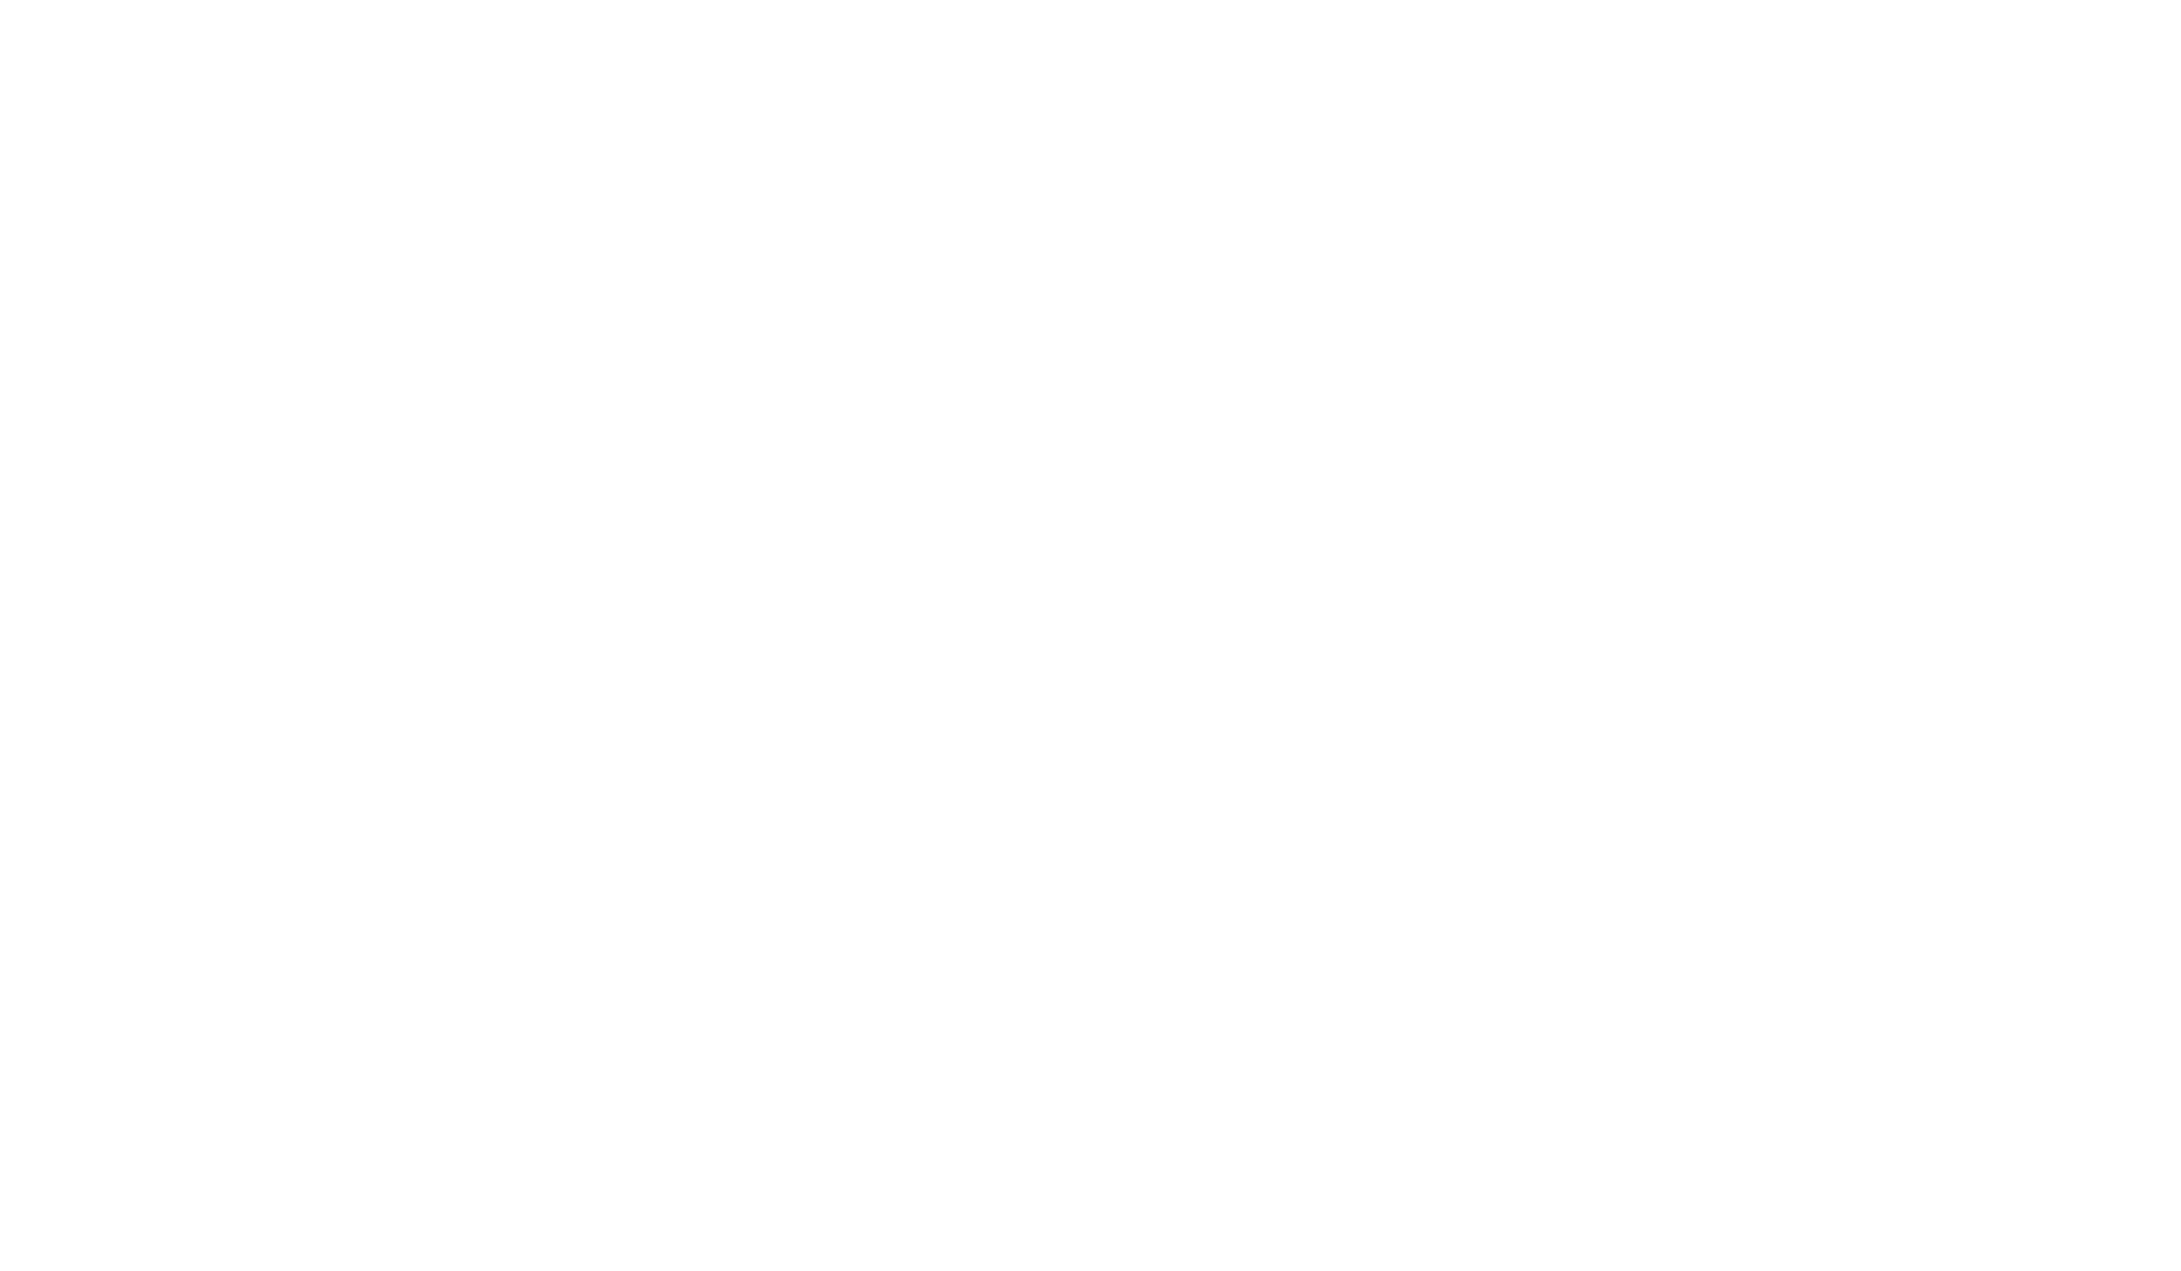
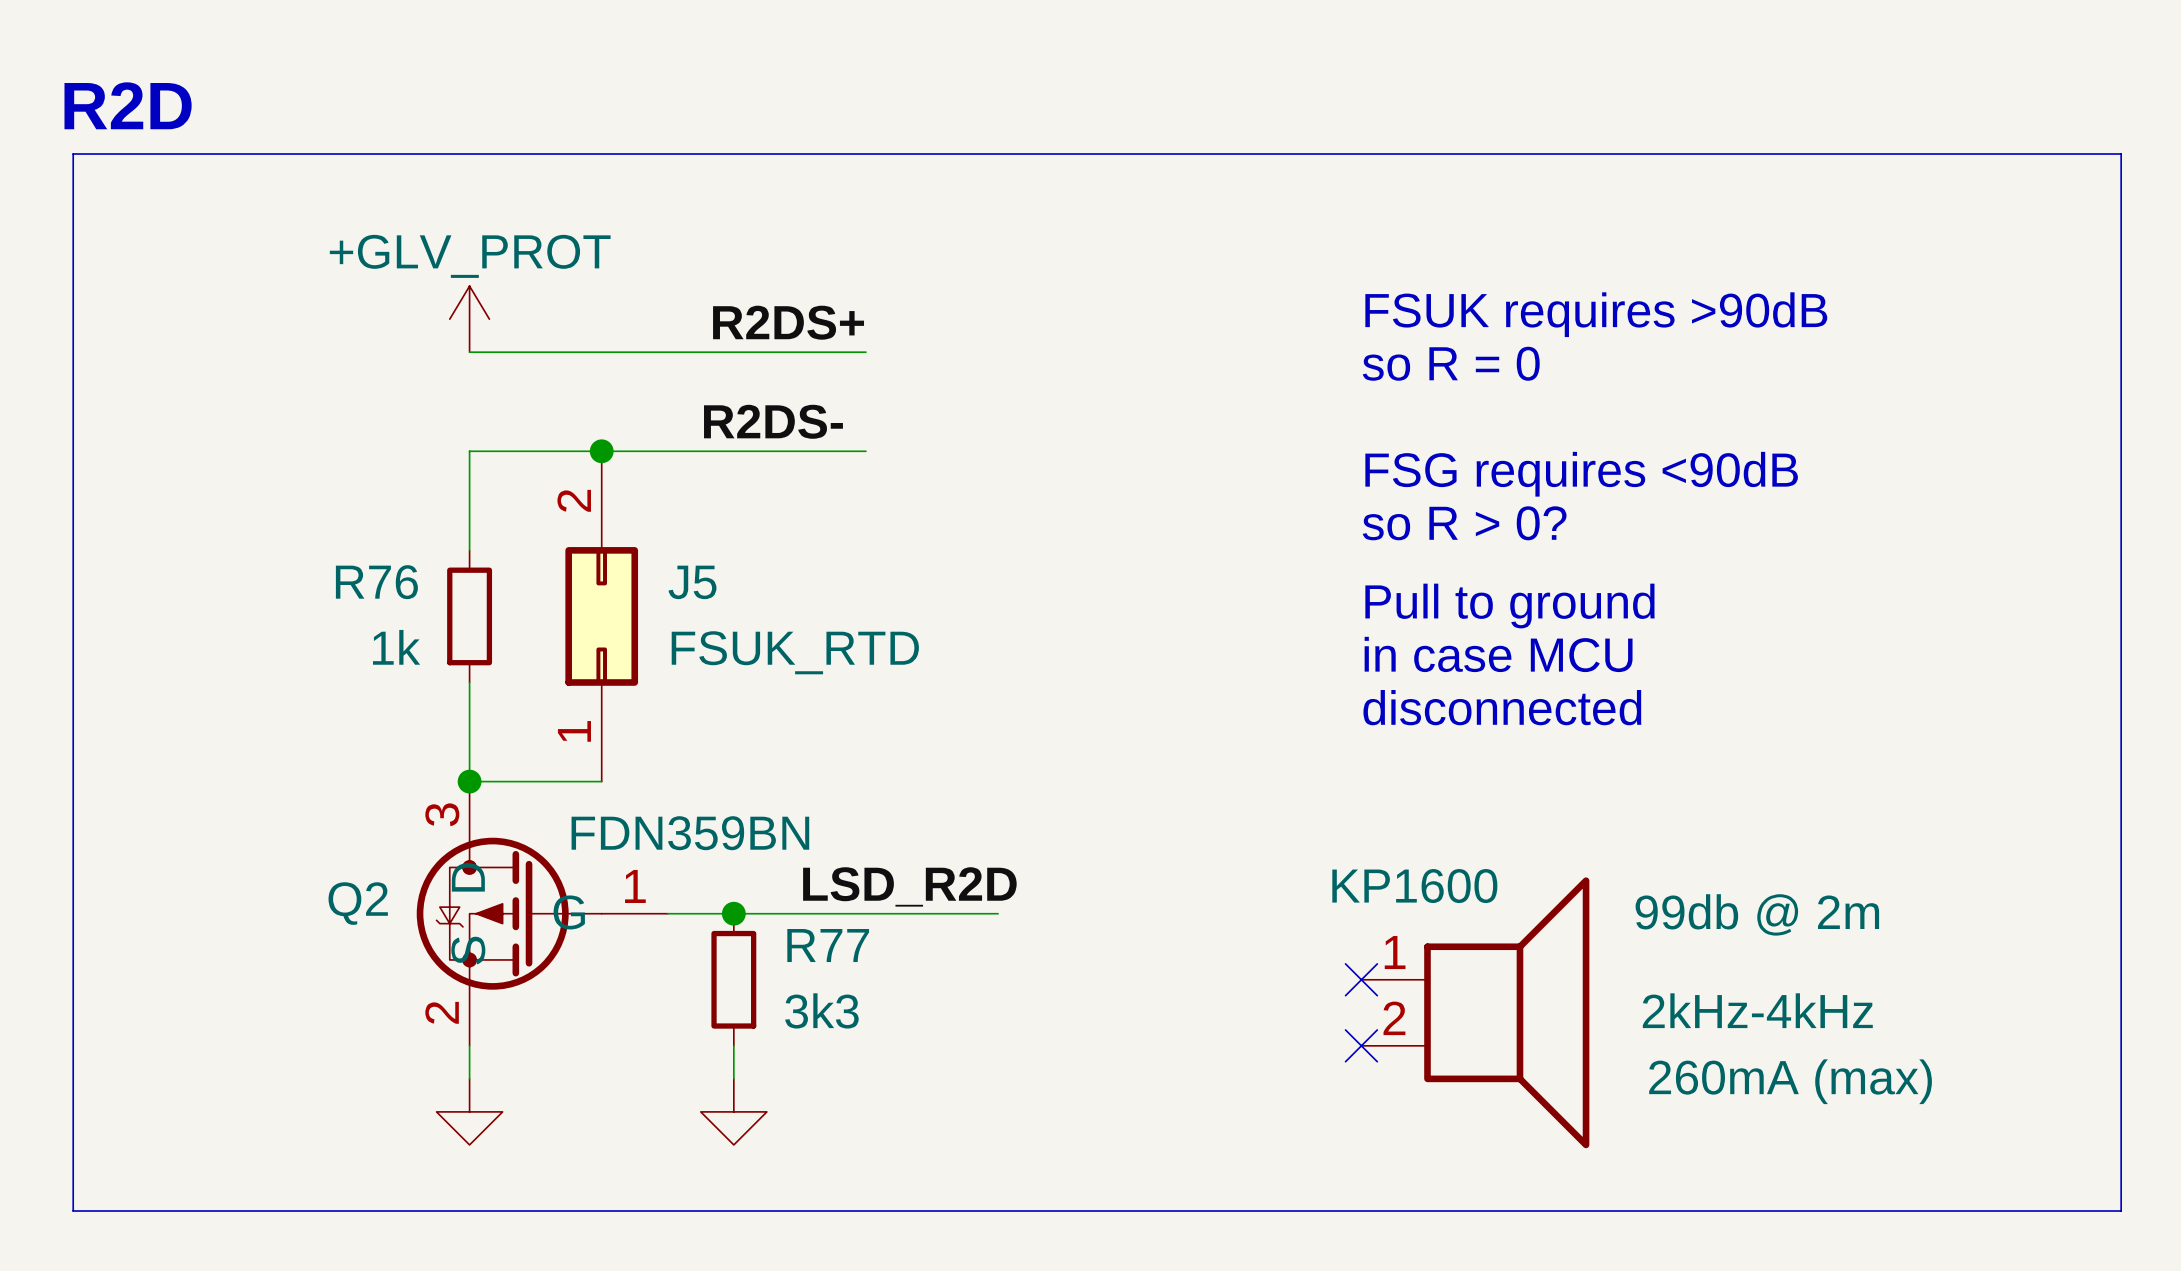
text: none -> R2D (128, 105)
line: none -> (73, 153) (2121, 153) (2121, 1211) (73, 1211) (73, 153)
text: none -> FSUK requires >90dB (1596, 314)
power symbol: none -> +GLV_PROT (469, 319)
label: none -> R2DS+ (788, 322)
wire: none -> (469, 352) (865, 352)
text: none -> so R = 0 (1451, 363)
label: none -> R2DS- (773, 421)
junction: none -> (601, 451)
wire: none -> (865, 451) (469, 451) (469, 550)
text: none -> FSG requires <90dB (1581, 474)
text: none -> so R > 0? (1464, 523)
text: none -> Pull to ground (1509, 606)
R76: none -> 1k (469, 616)
J5: none -> FSUK_RTD (601, 616)
text: none -> in case MCU (1498, 654)
wire: none -> (469, 682) (469, 781) (601, 781)
text: none -> disconnected (1502, 707)
junction: none -> (469, 781)
label: none -> LSD_R2D (909, 886)
Q2: none -> FDN359BN (542, 913)
wire: none -> (667, 913) (998, 913)
junction: none -> (733, 913)
R77: none -> 3k3 (733, 979)
no-connect mark: none -> (1361, 979)
power symbol: none -> KP1600 (1475, 1012)
wire: none -> (469, 1045) (469, 1078)
wire: none -> (733, 1045) (733, 1078)
no-connect mark: none -> (1361, 1045)
power symbol: none -> (469, 1111)
power symbol: none -> (733, 1111)

